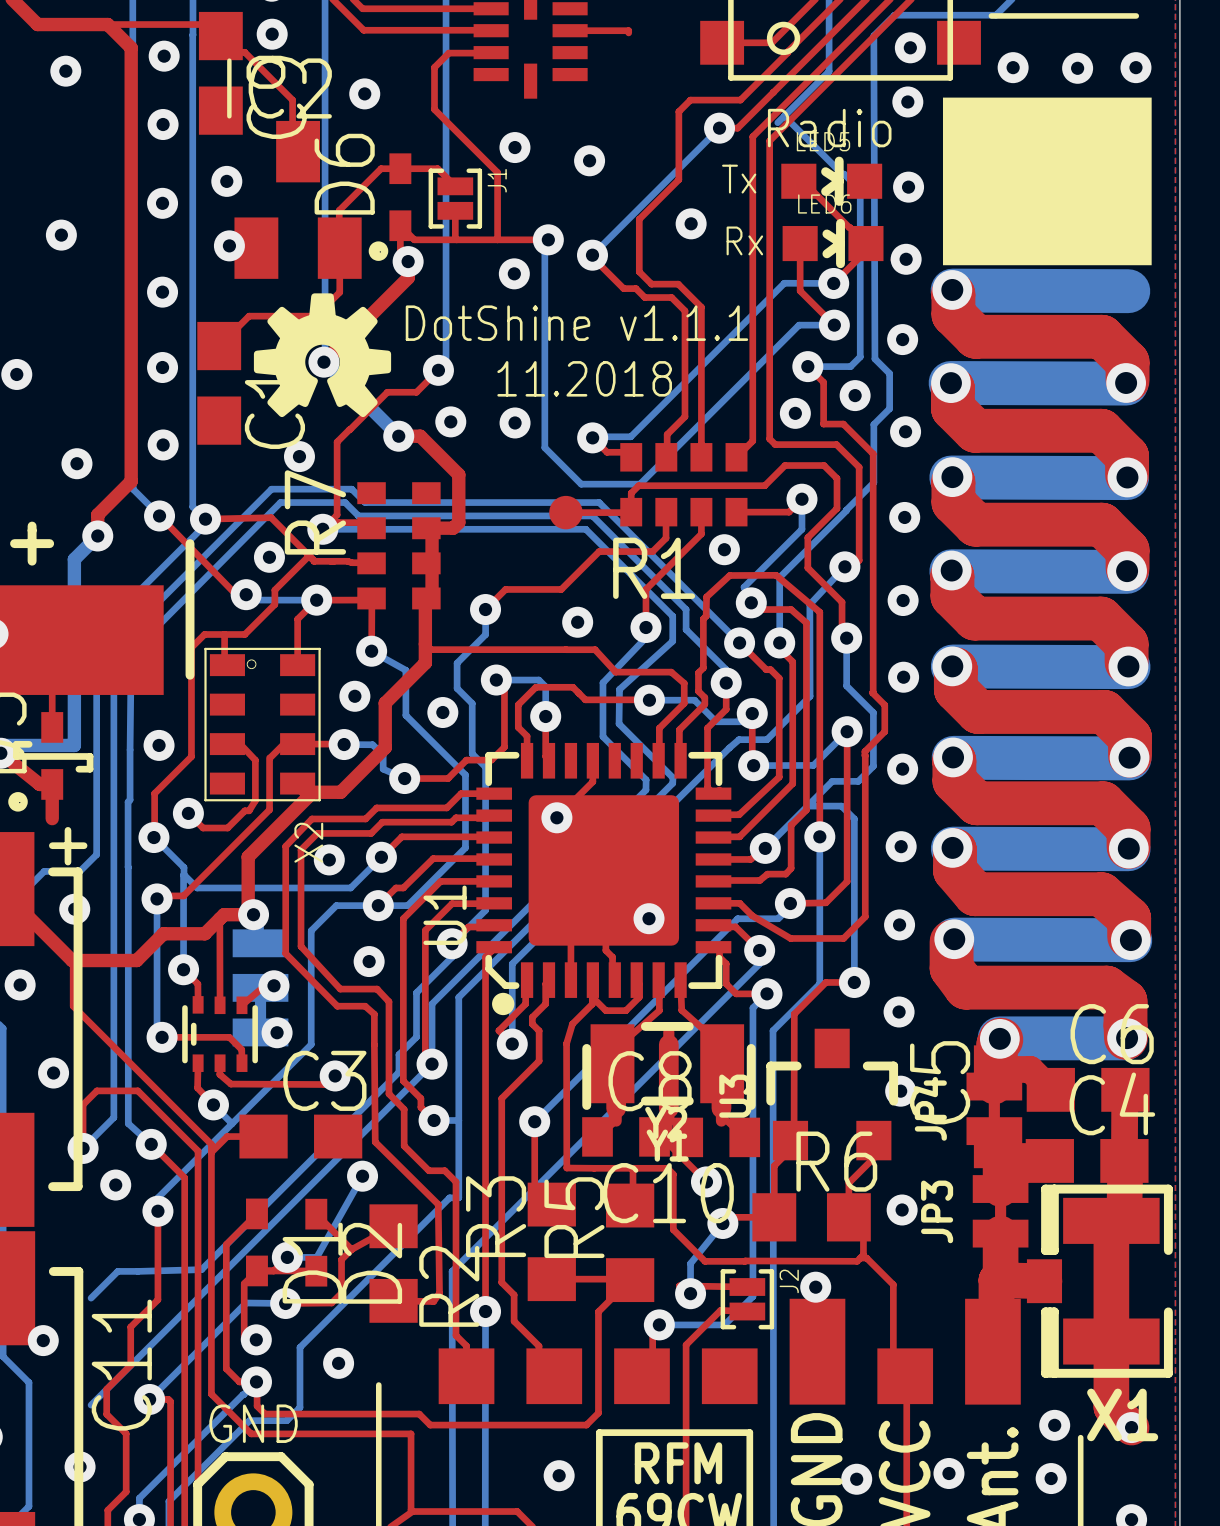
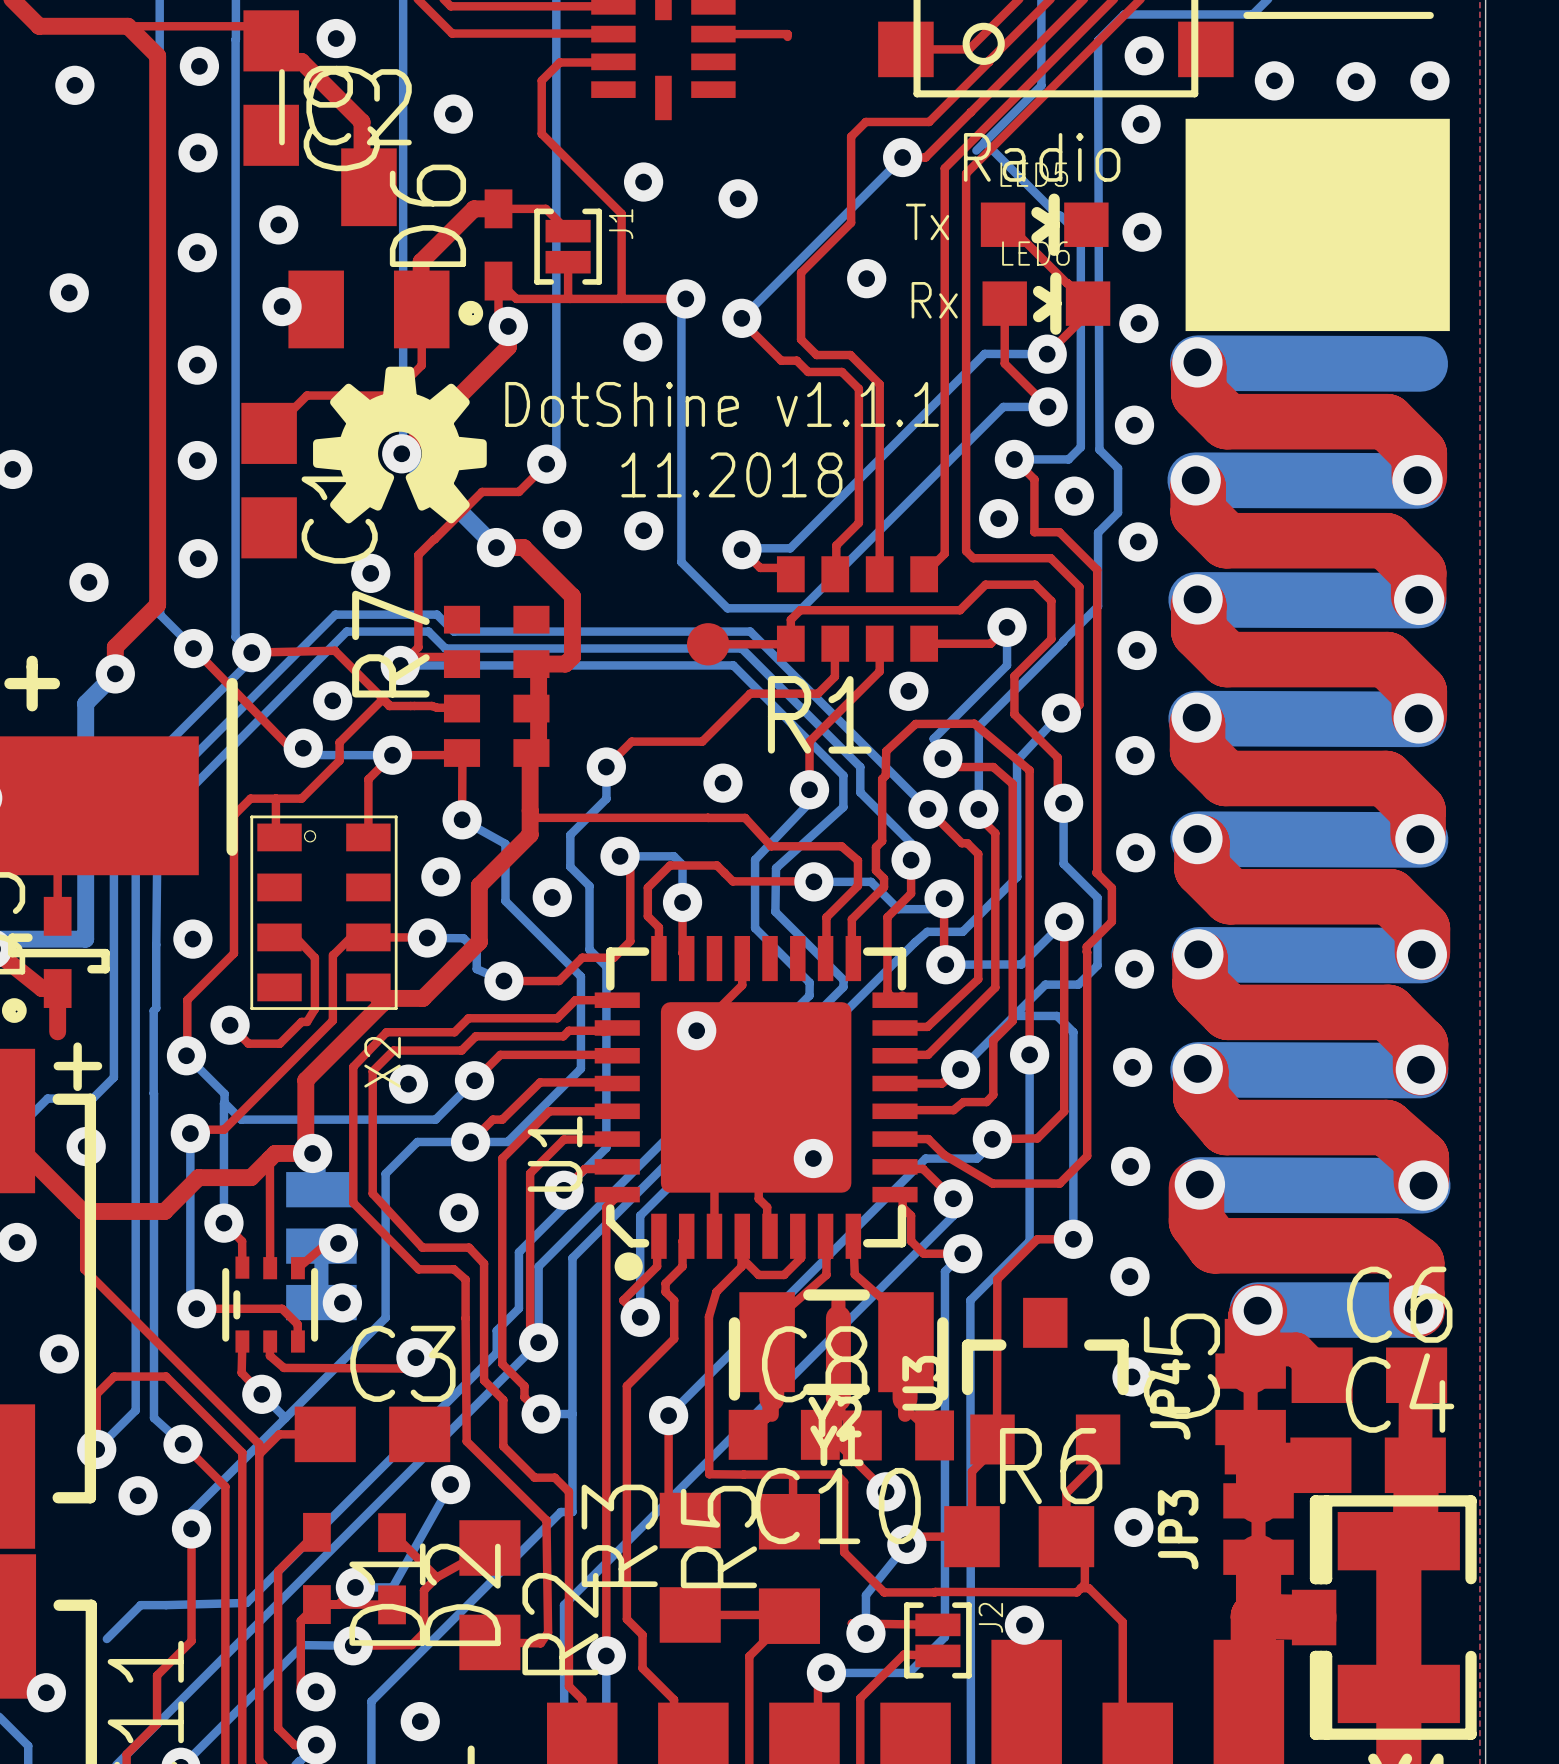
top track width: thin (220, 36) (237, 52) (244, 52) (292, 100) (292, 146) -> thick (271, 40) (291, 61) (301, 61) (362, 121) (362, 180)
top track width: thin (400, 168) (381, 168) (339, 210) (339, 247) -> thick (498, 208) (474, 208) (421, 261) (421, 308)

